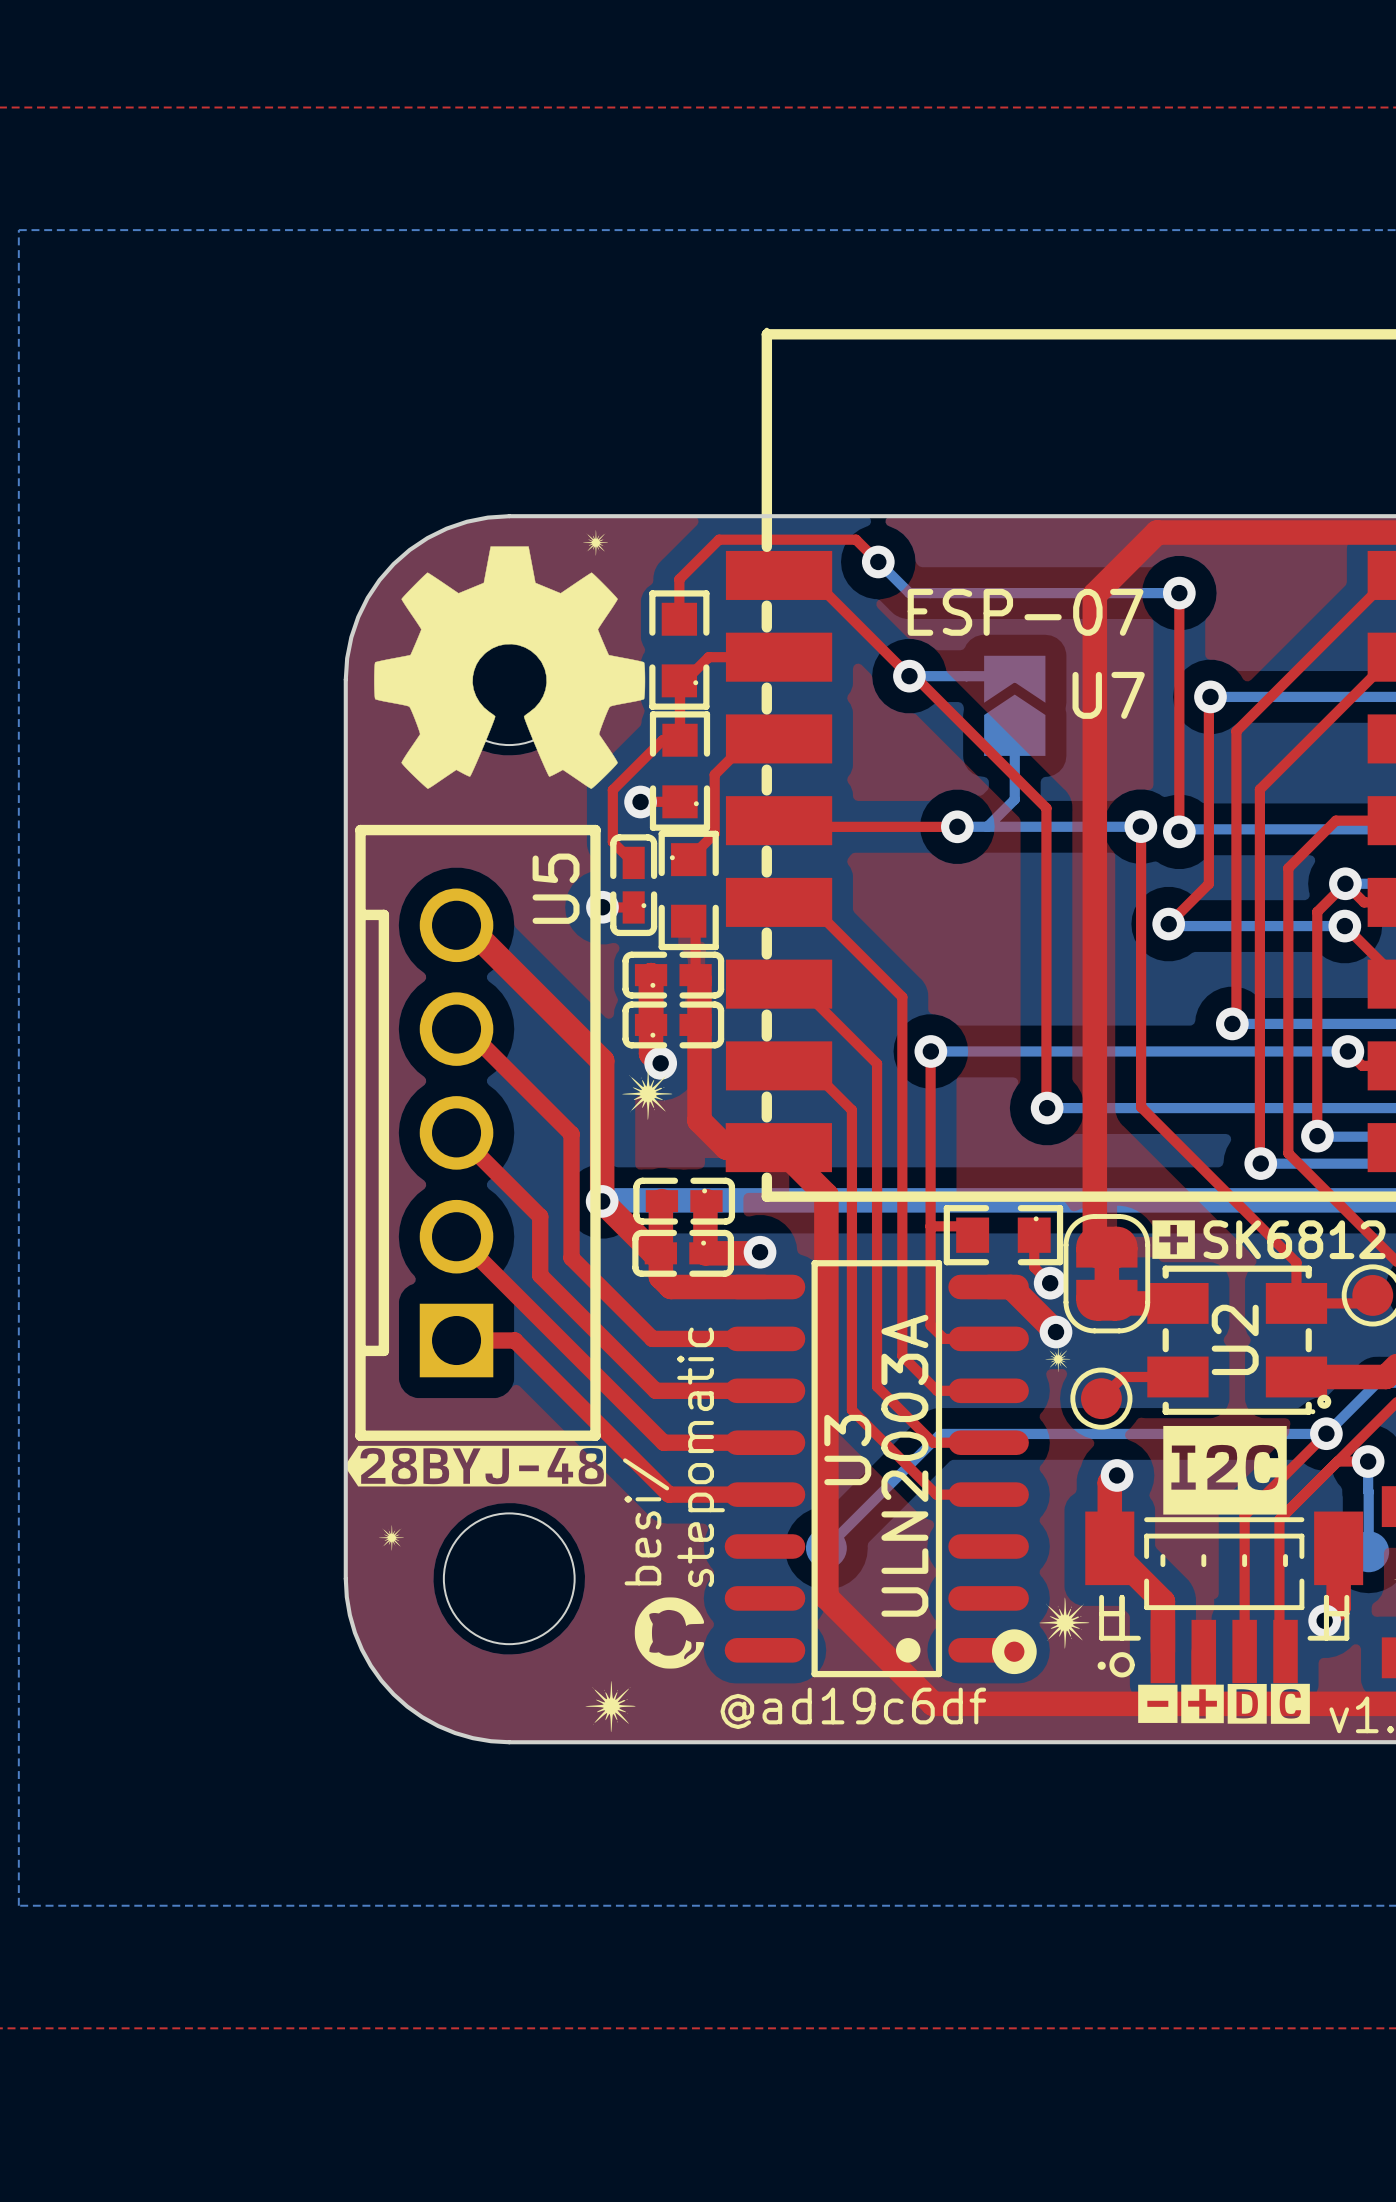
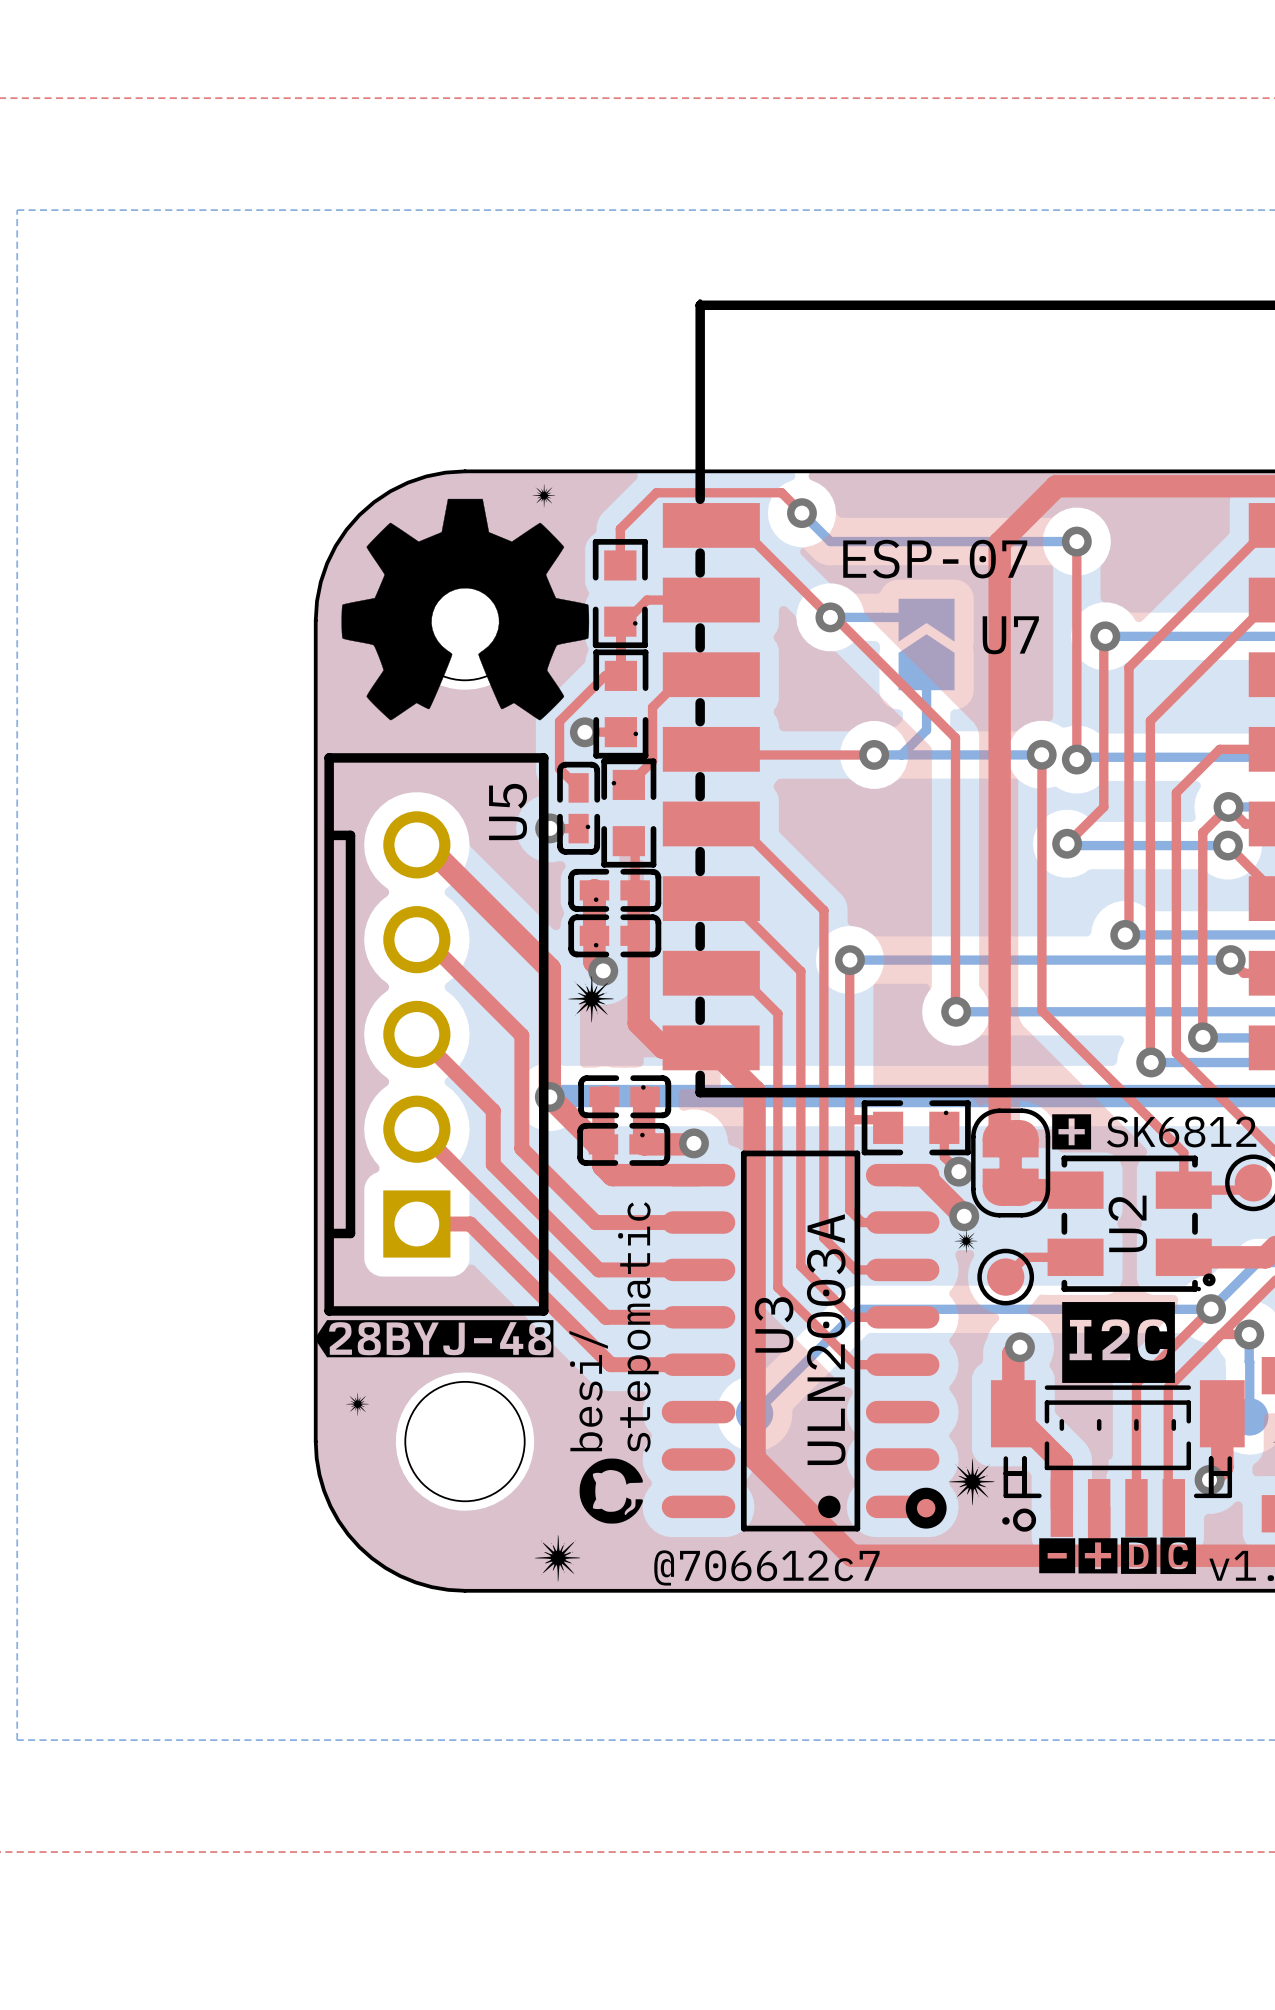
text: @ad19c6df (853, 1708) -> @706612c7 (766, 1567)

